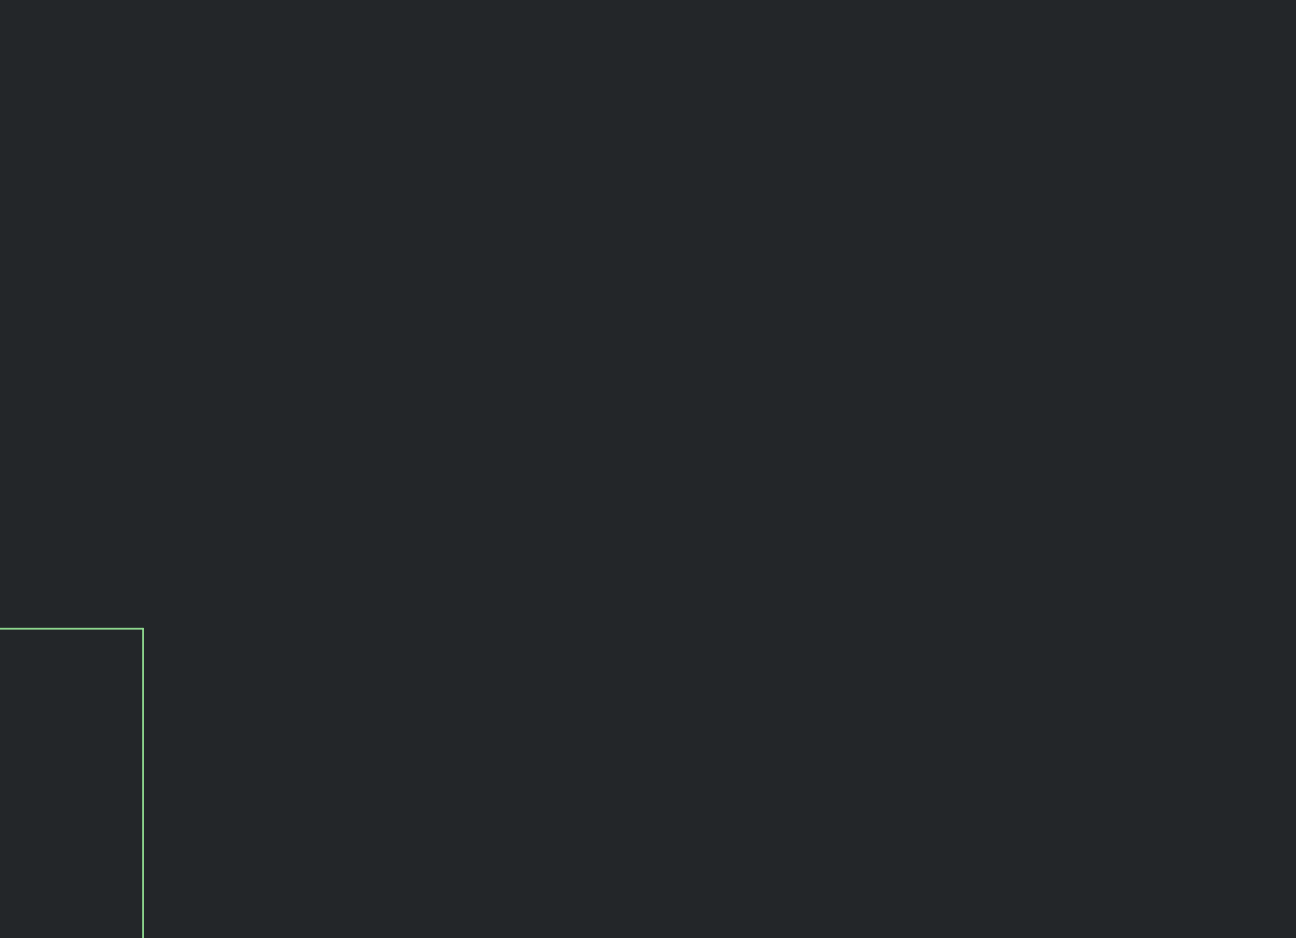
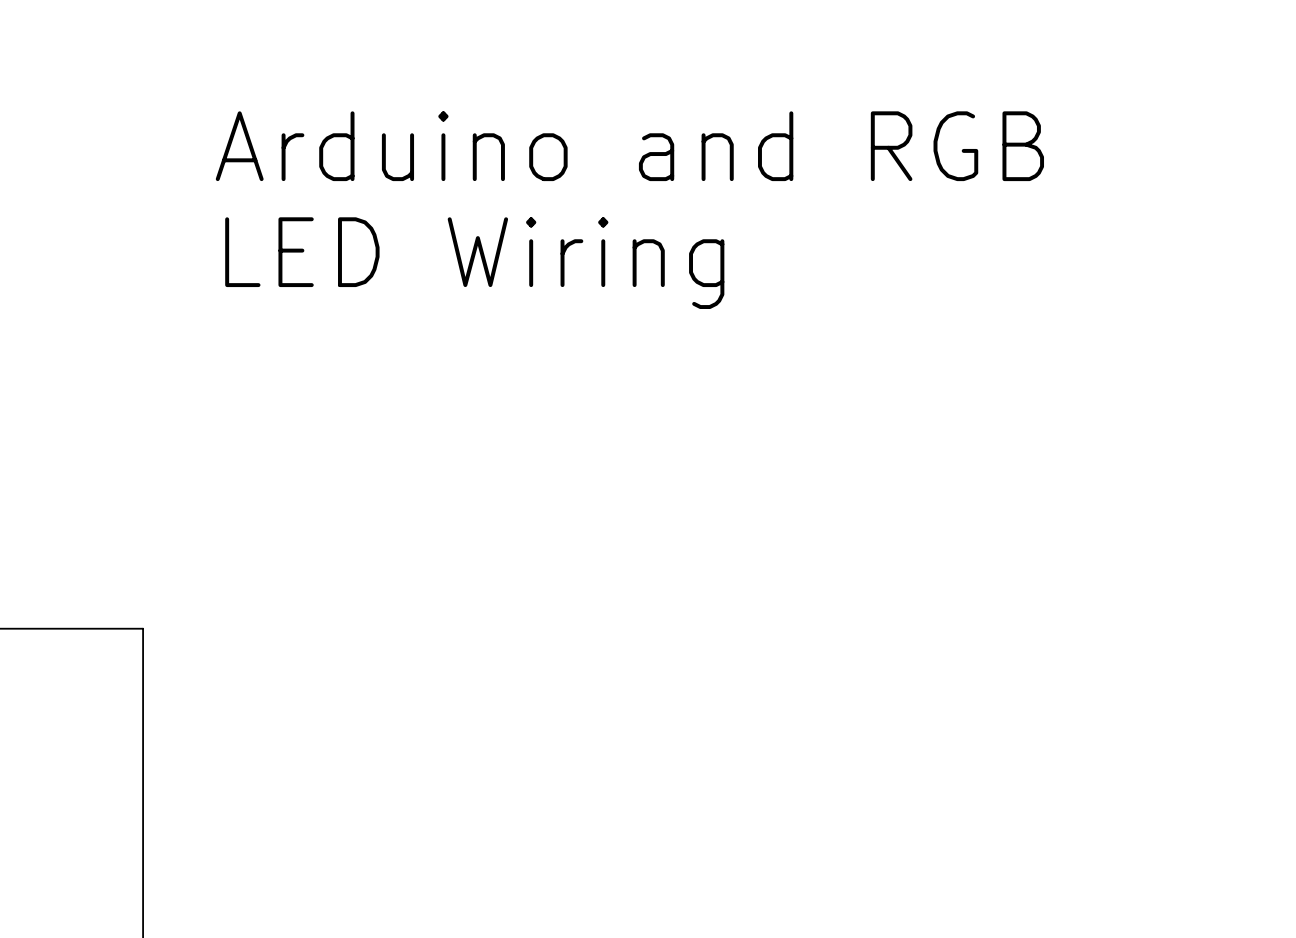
text: none -> Arduino and RGB (629, 146)
text: none -> LED Wiring (474, 263)

